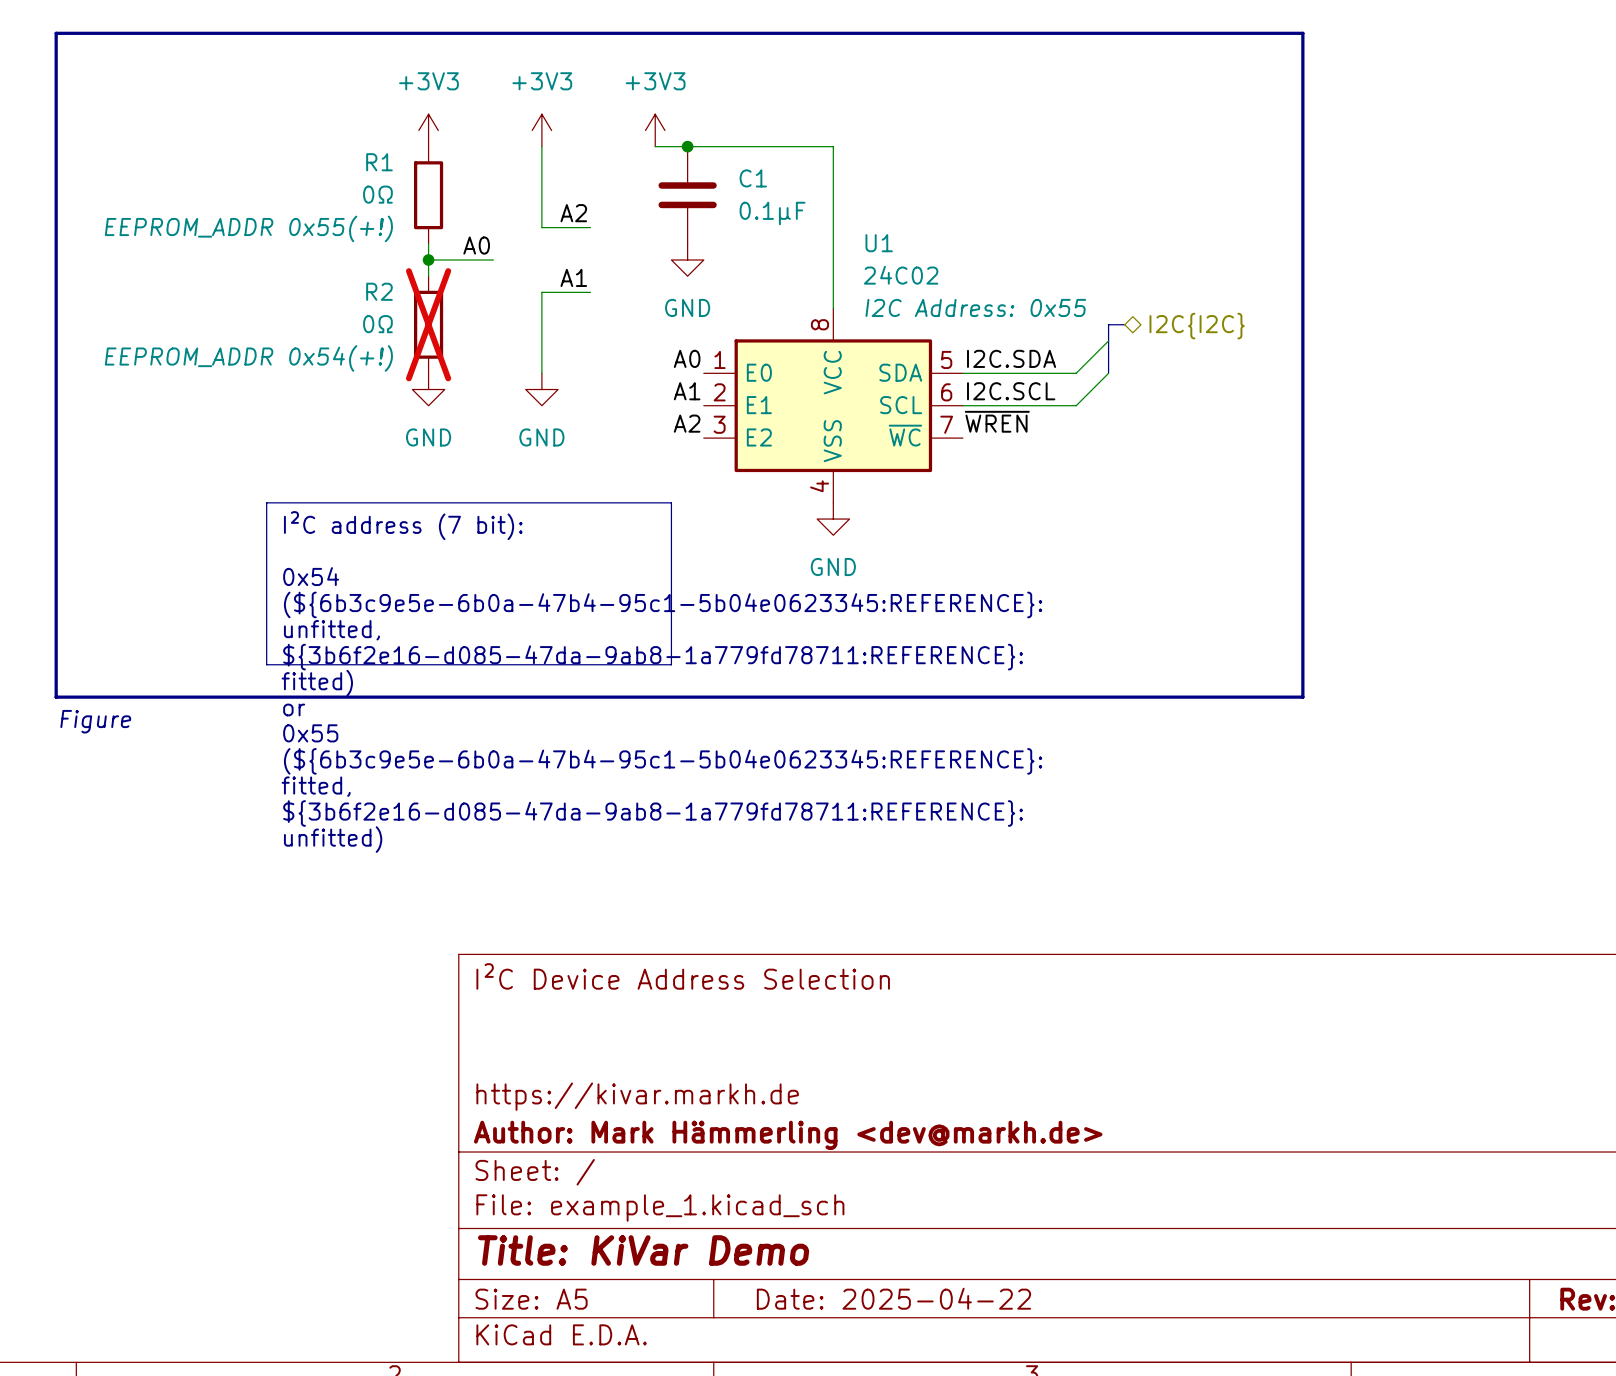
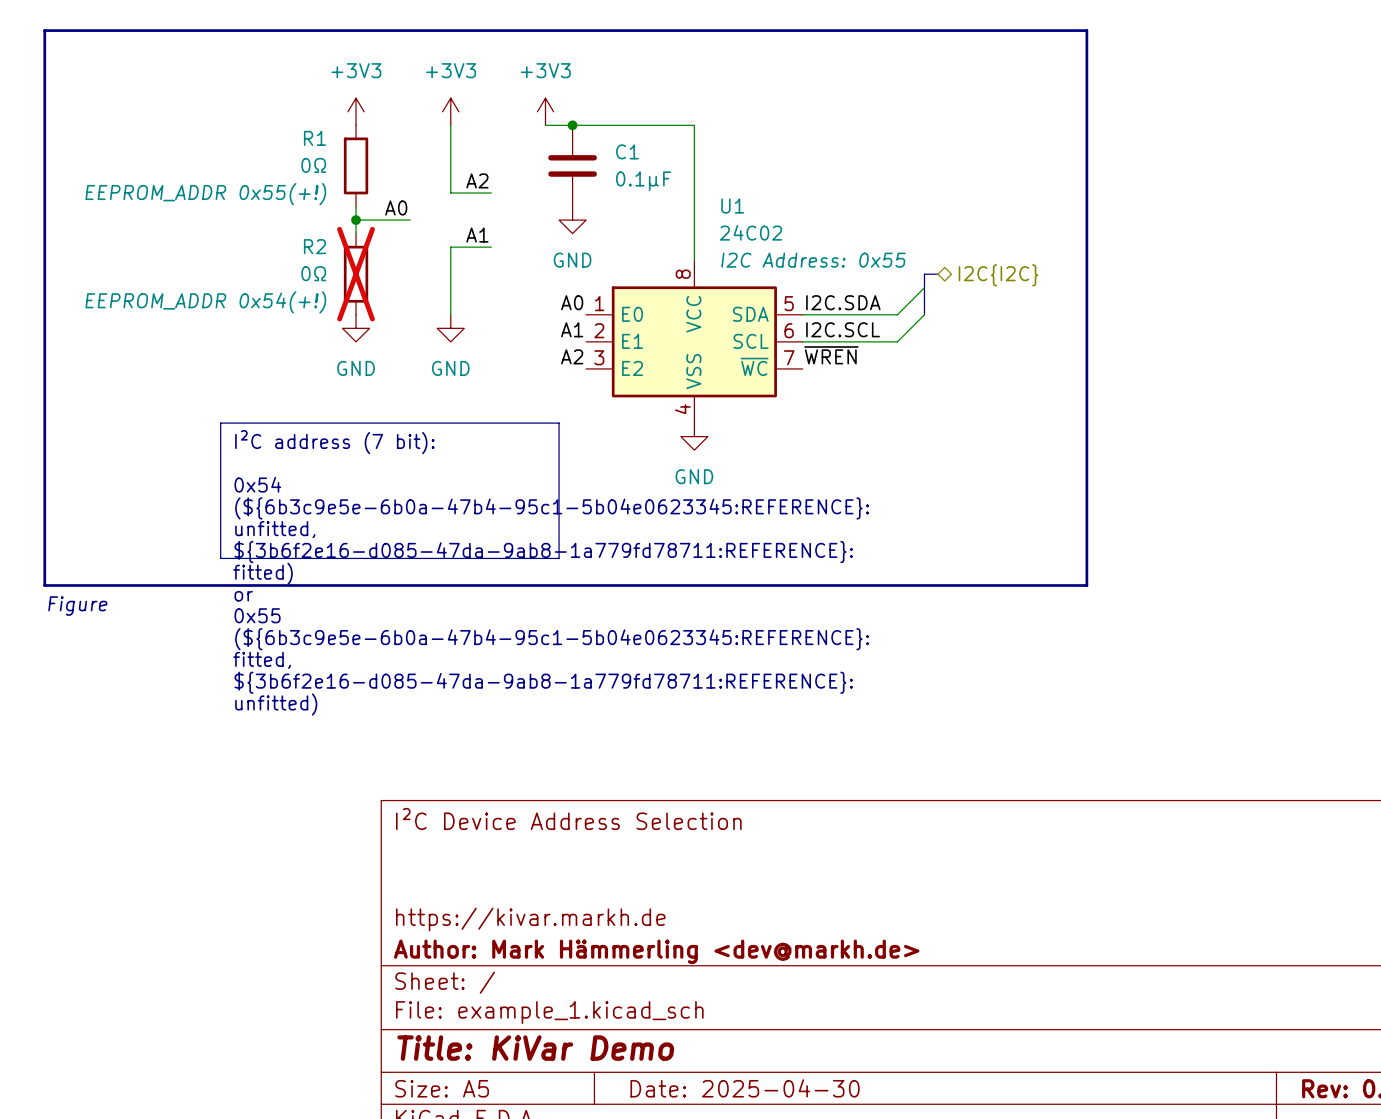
title block: Date: 2025-04-22 (893, 1298) -> Date: 2025-04-30 (745, 1088)

